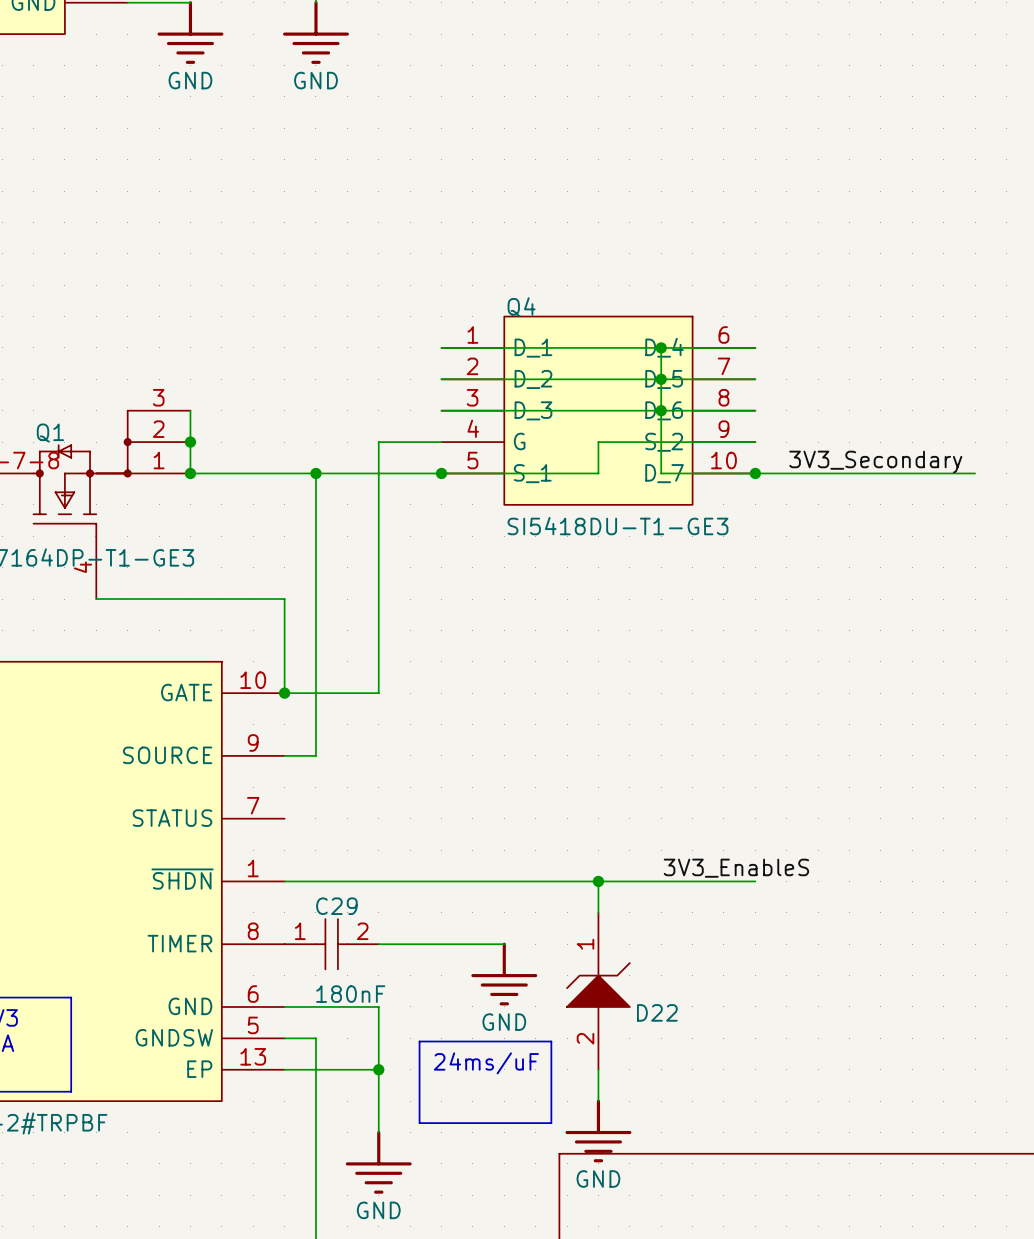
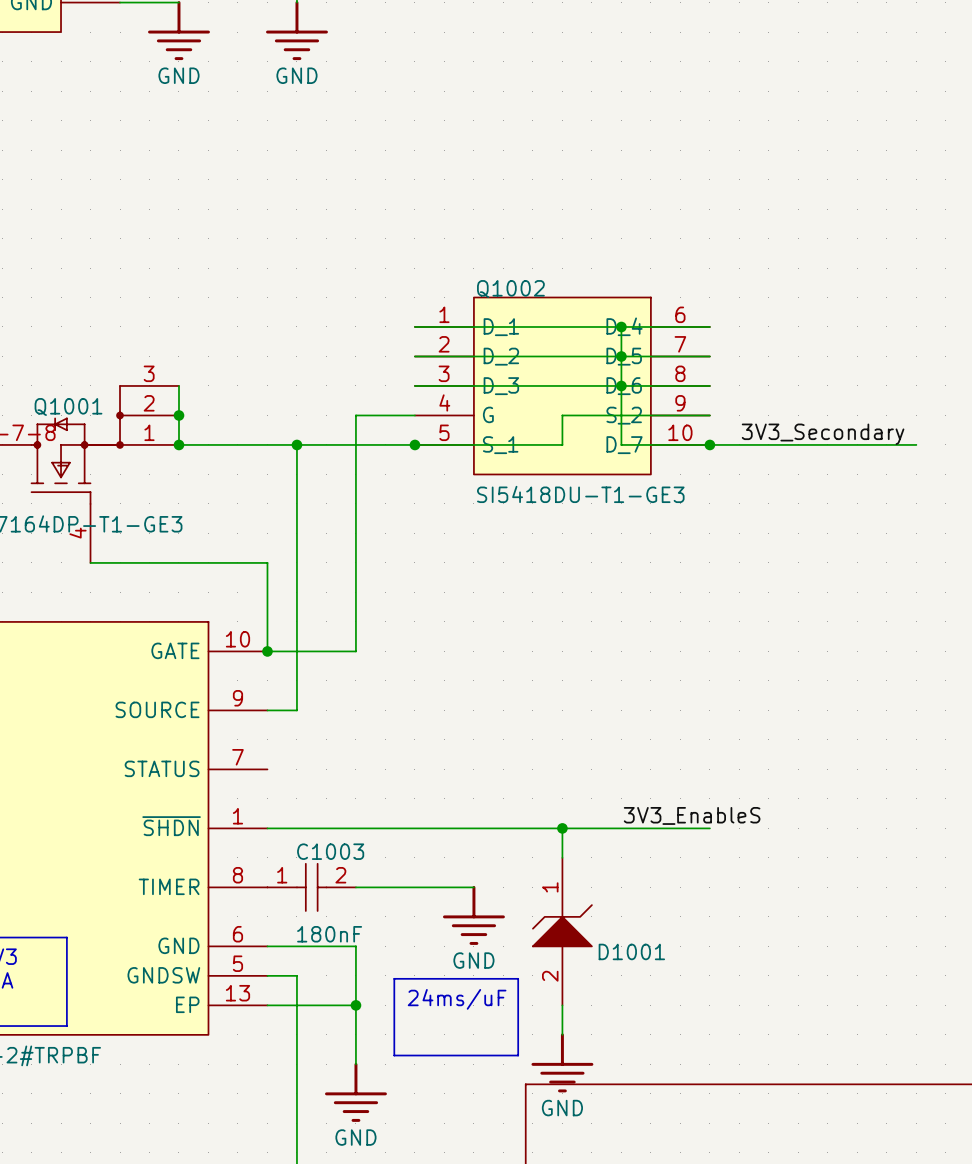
Q4 name: Q4 (521, 307) -> Q1002 (510, 289)
Q1 name: Q1 (50, 433) -> Q1001 (68, 407)
C29 name: C29 (336, 906) -> C1003 (330, 851)
D22 name: D22 (657, 1012) -> D1001 (631, 951)

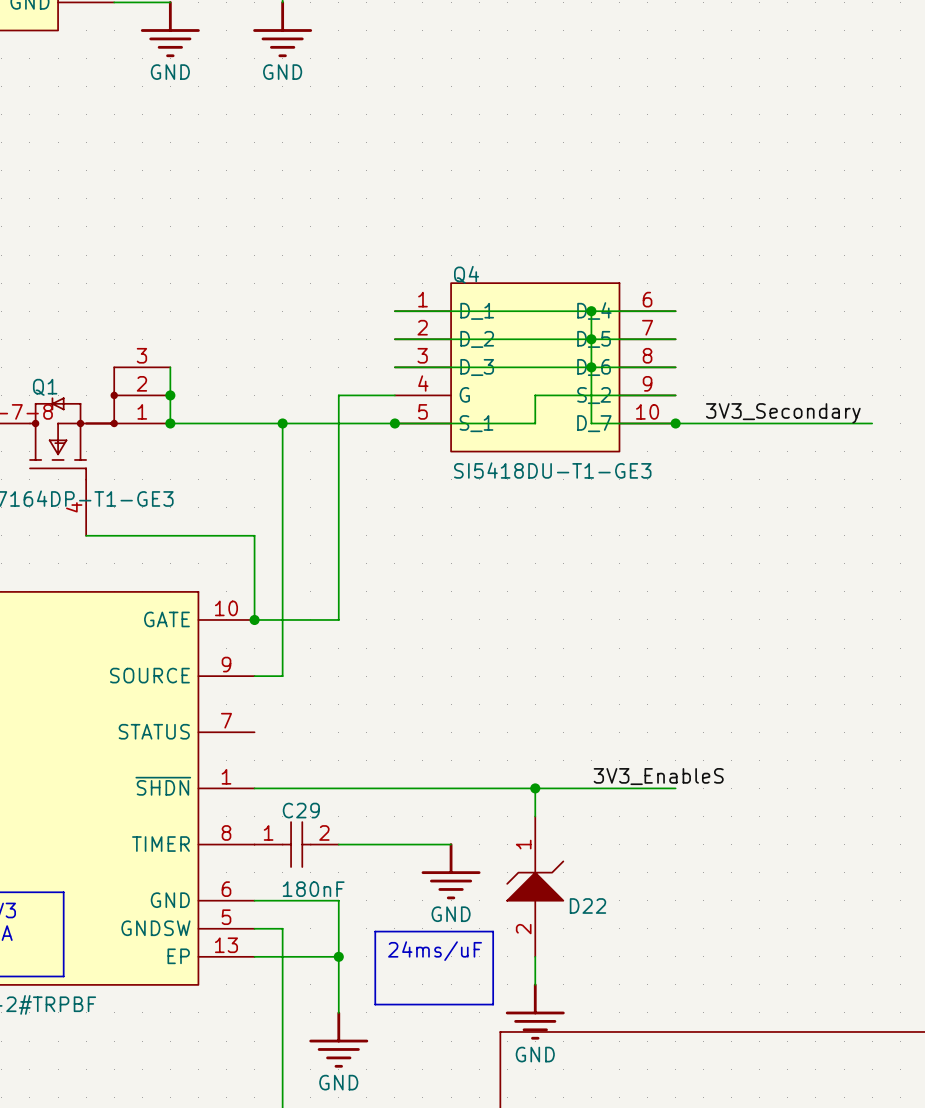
Q1002 name: Q1002 (510, 289) -> Q4 (466, 274)
Q1001 name: Q1001 (68, 407) -> Q1 (45, 387)
C1003 name: C1003 (330, 851) -> C29 (301, 810)
D1001 name: D1001 (631, 951) -> D22 (587, 905)

